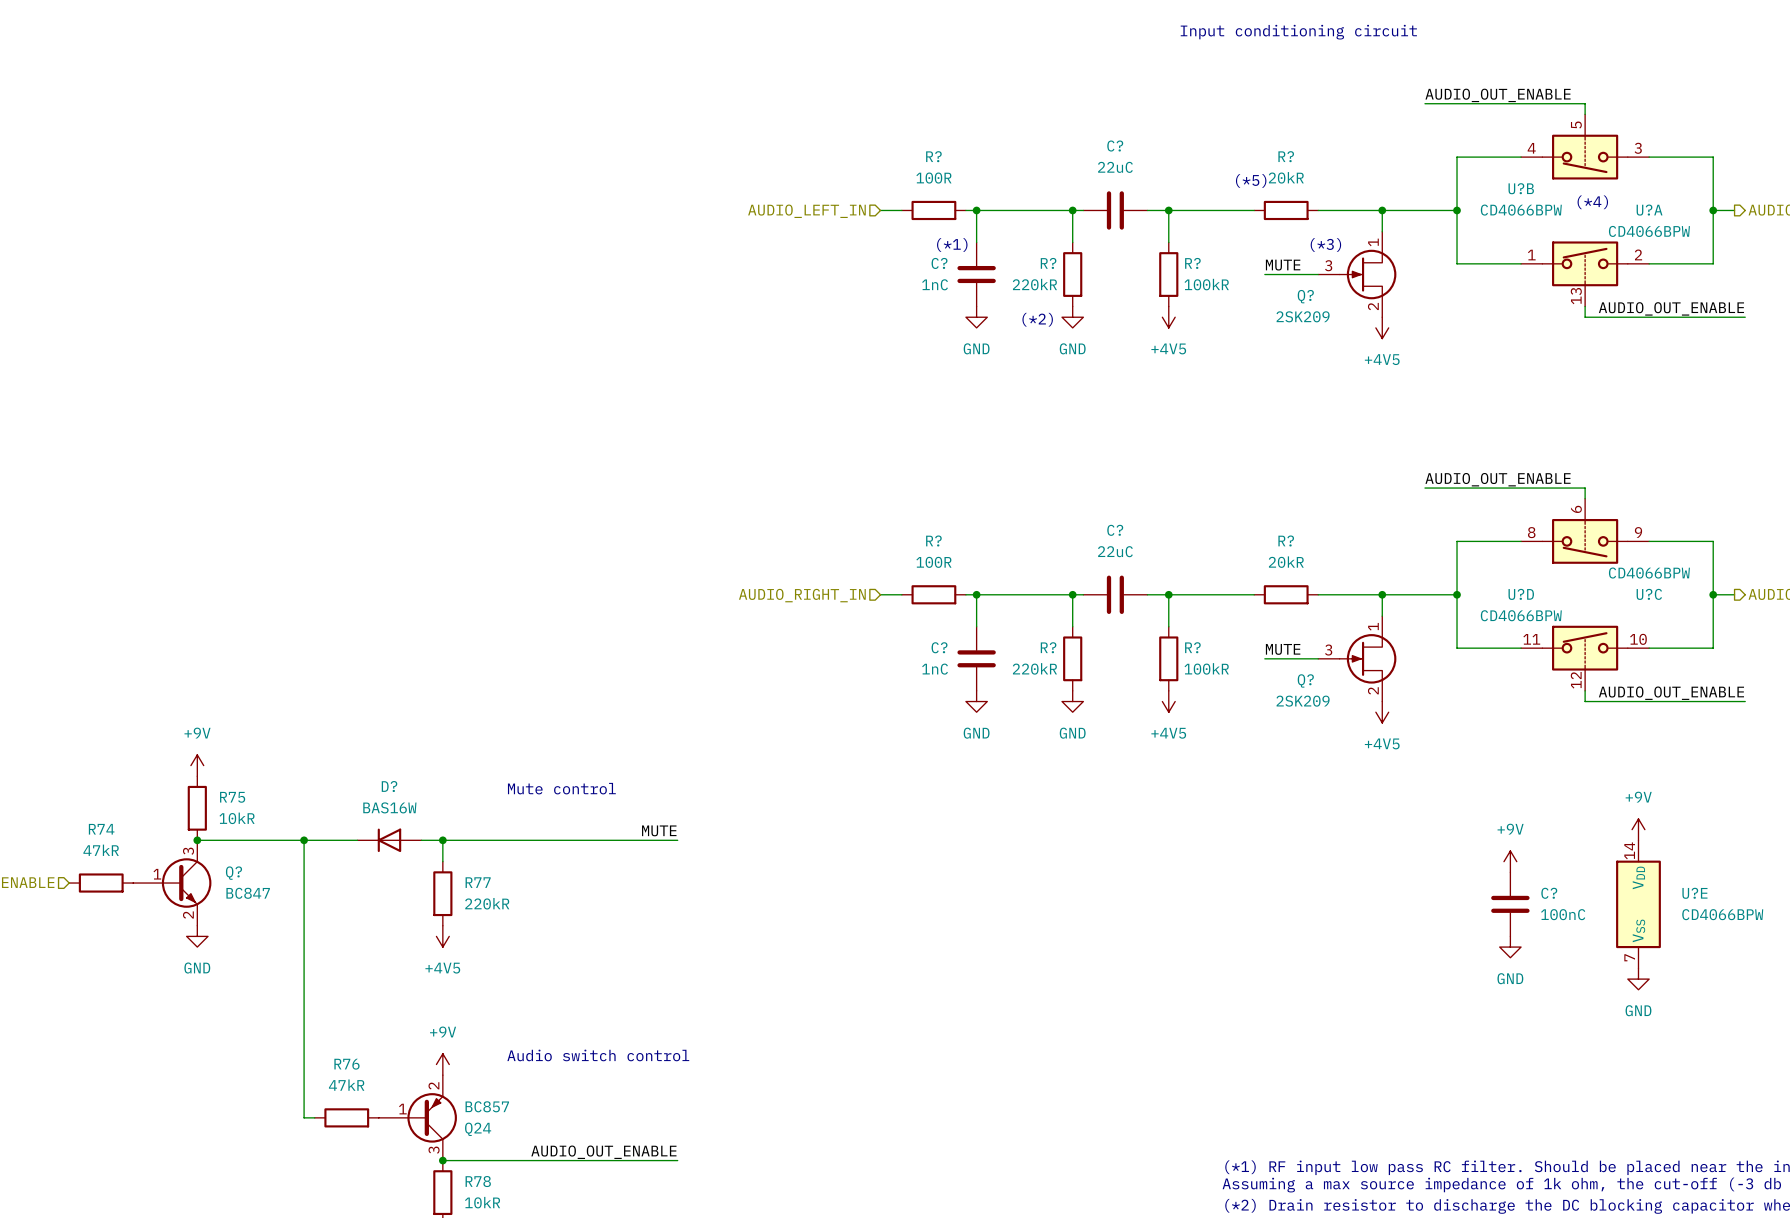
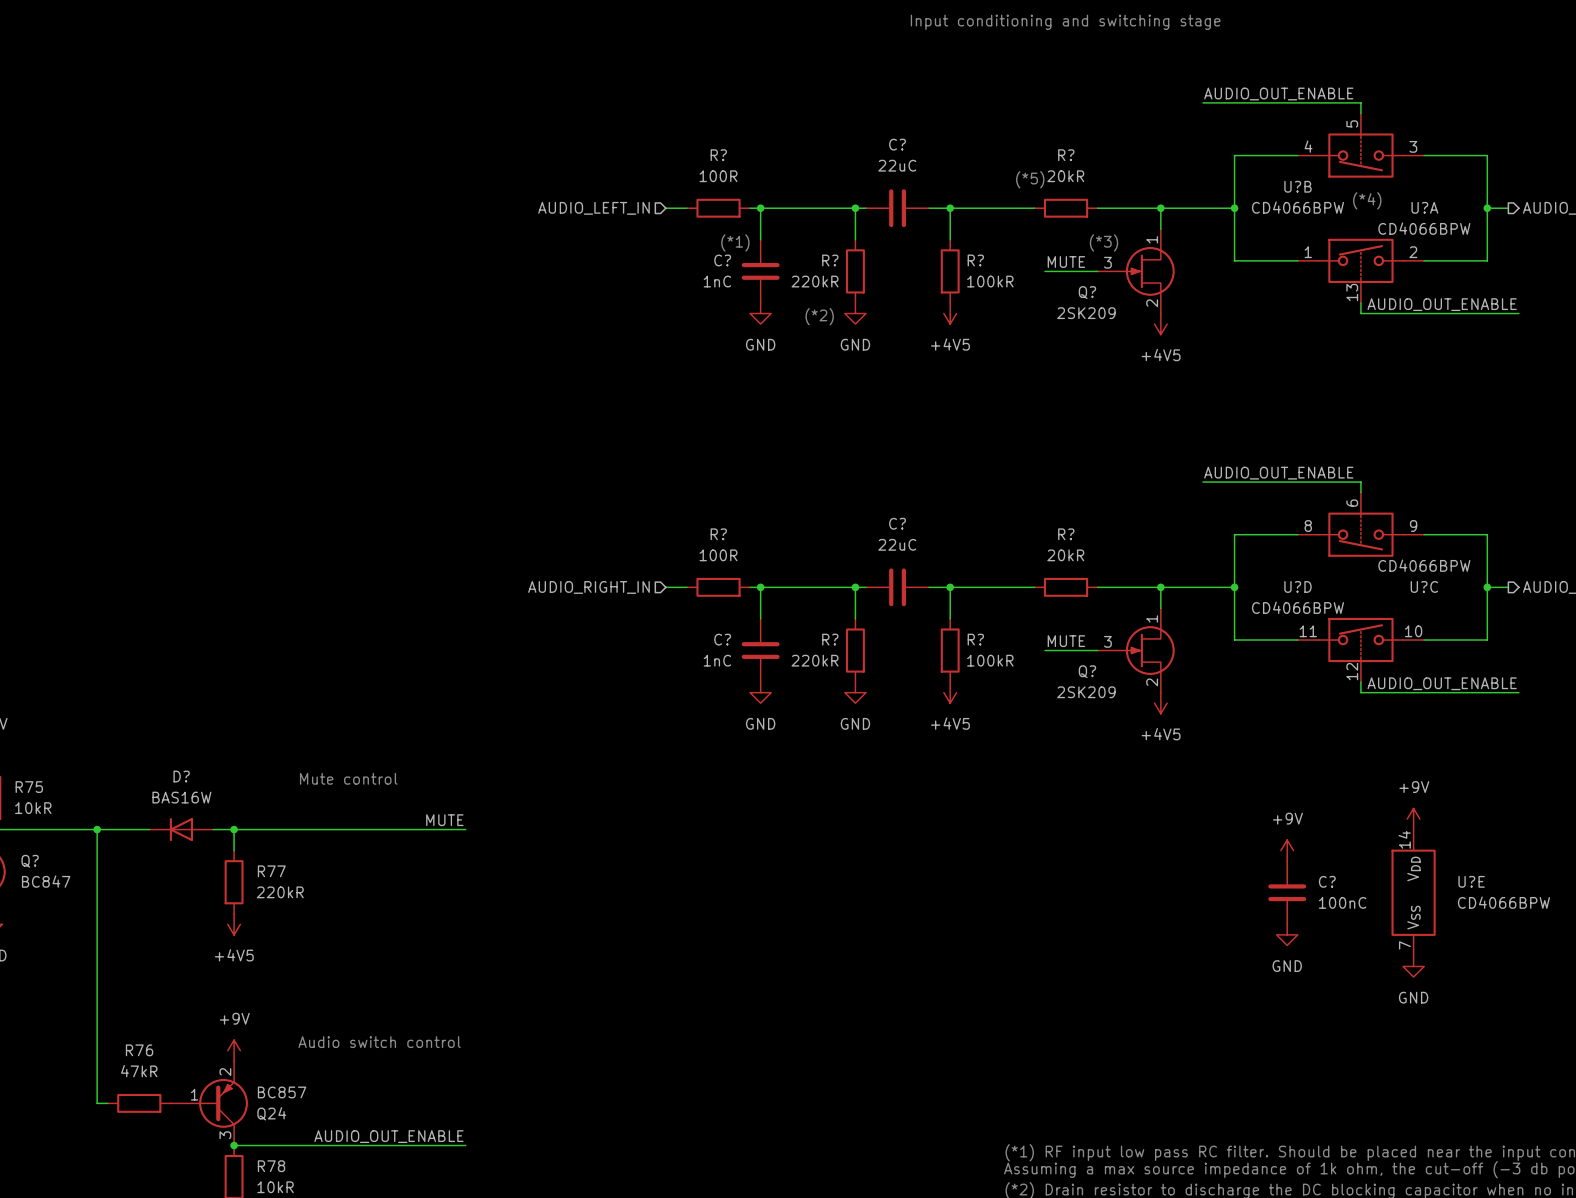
text: Input conditioning circuit (1298, 32) -> Input conditioning and switching stage (1065, 22)

